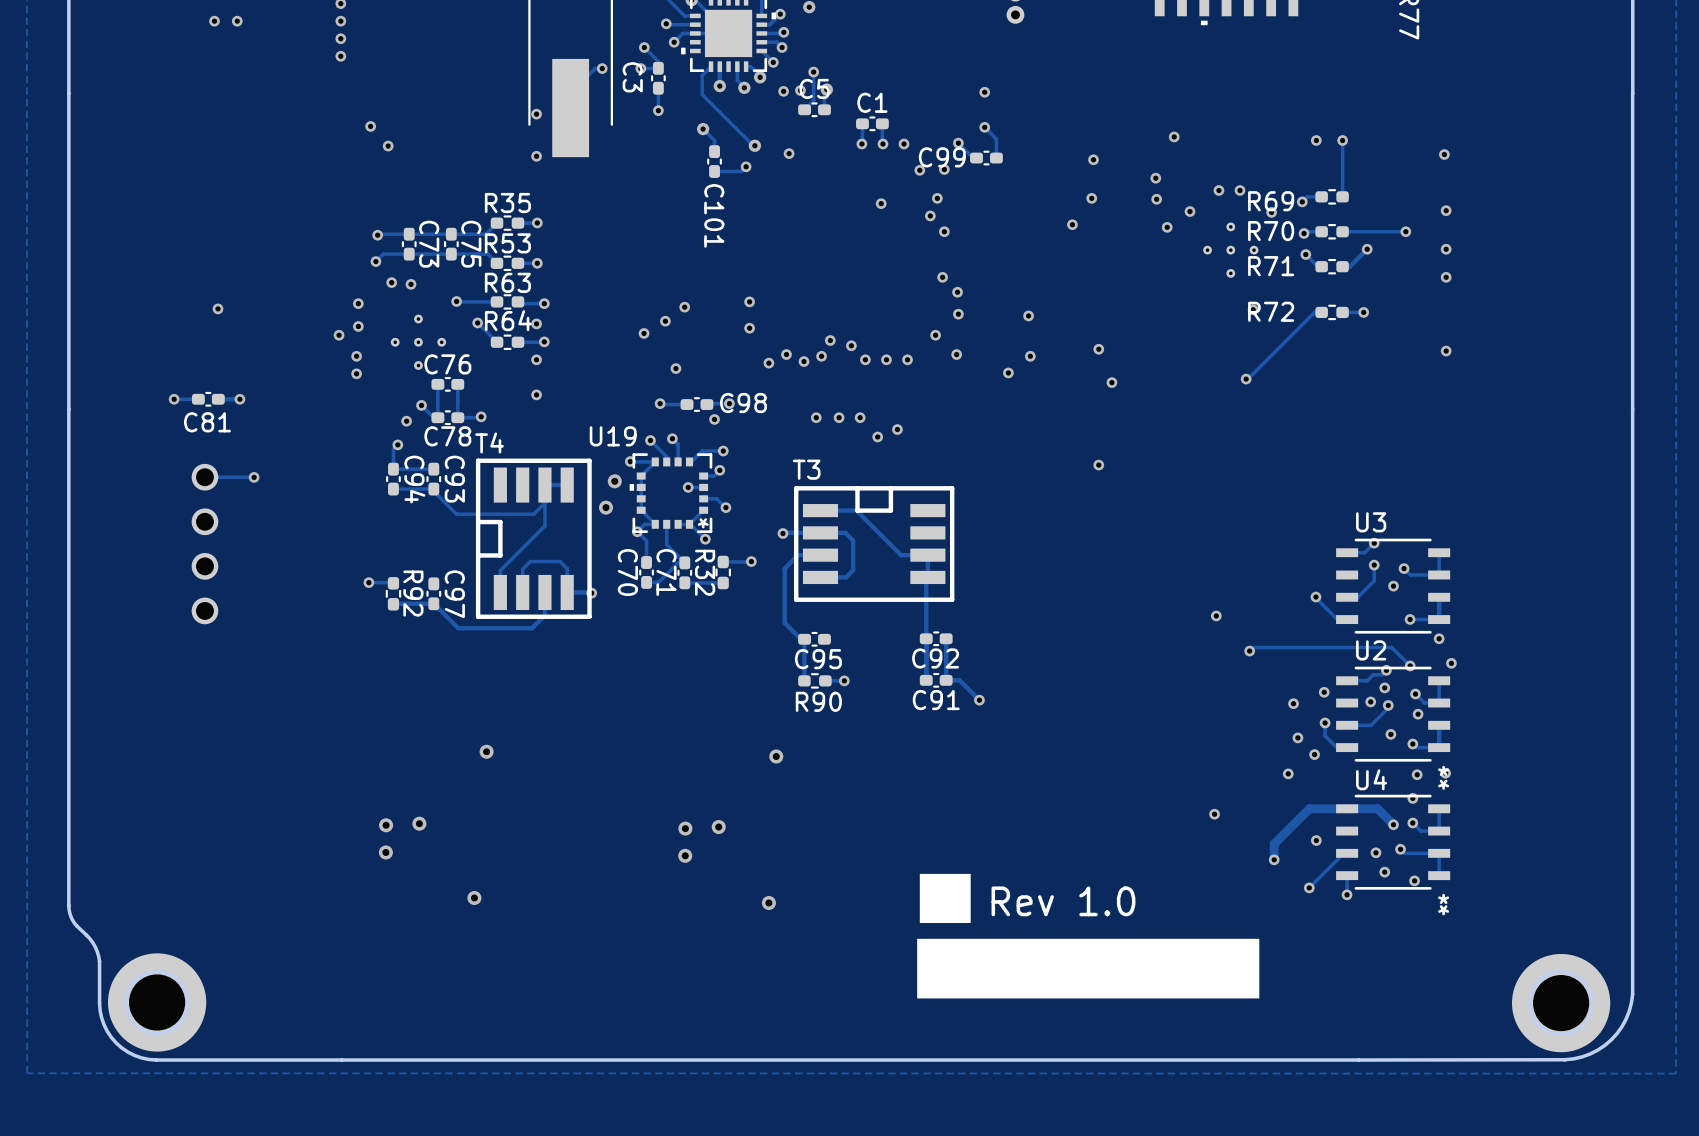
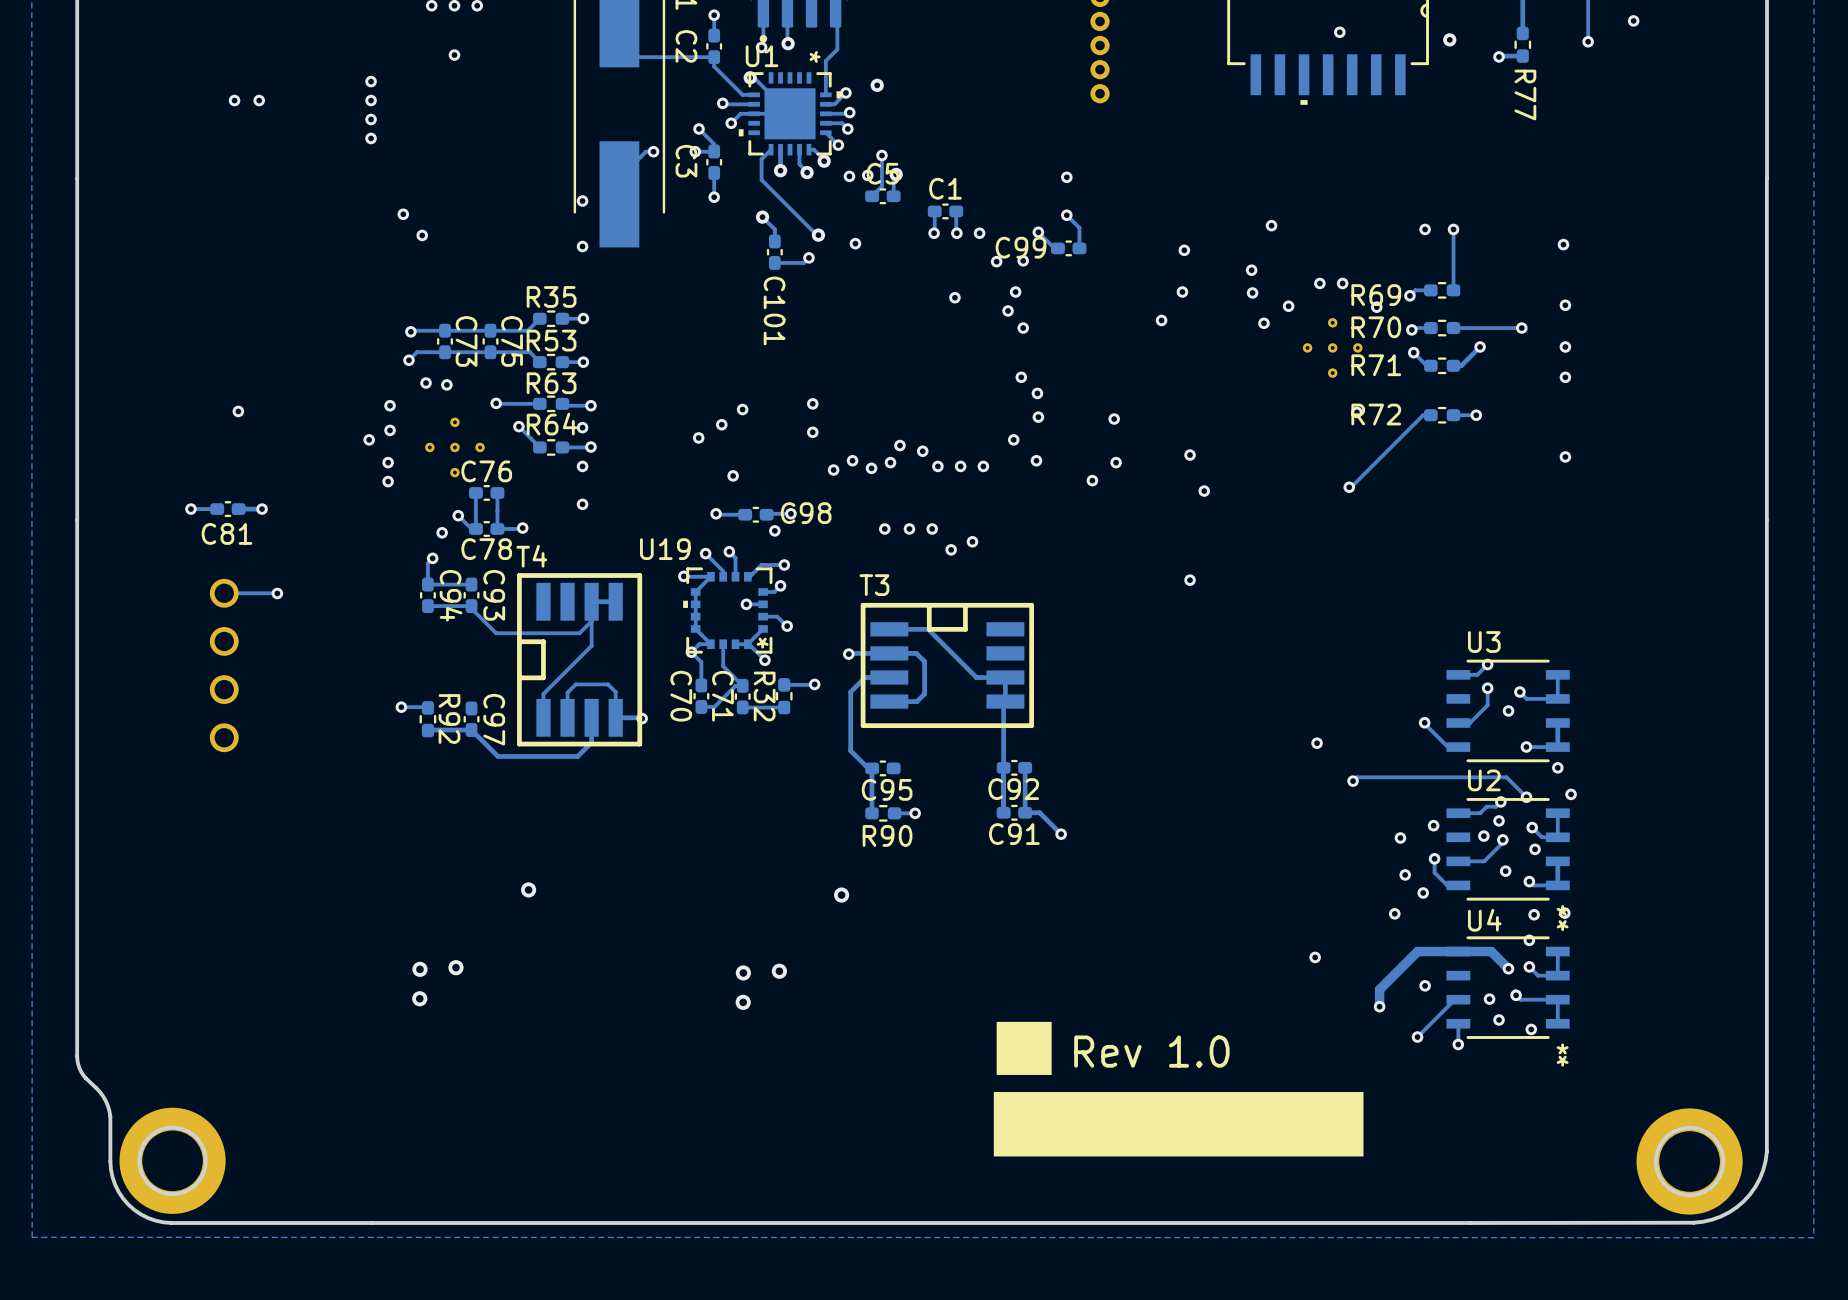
via: (614, 481) -> none
via: (606, 507) -> none
via: (474, 897) -> none
via: (768, 902) -> none

